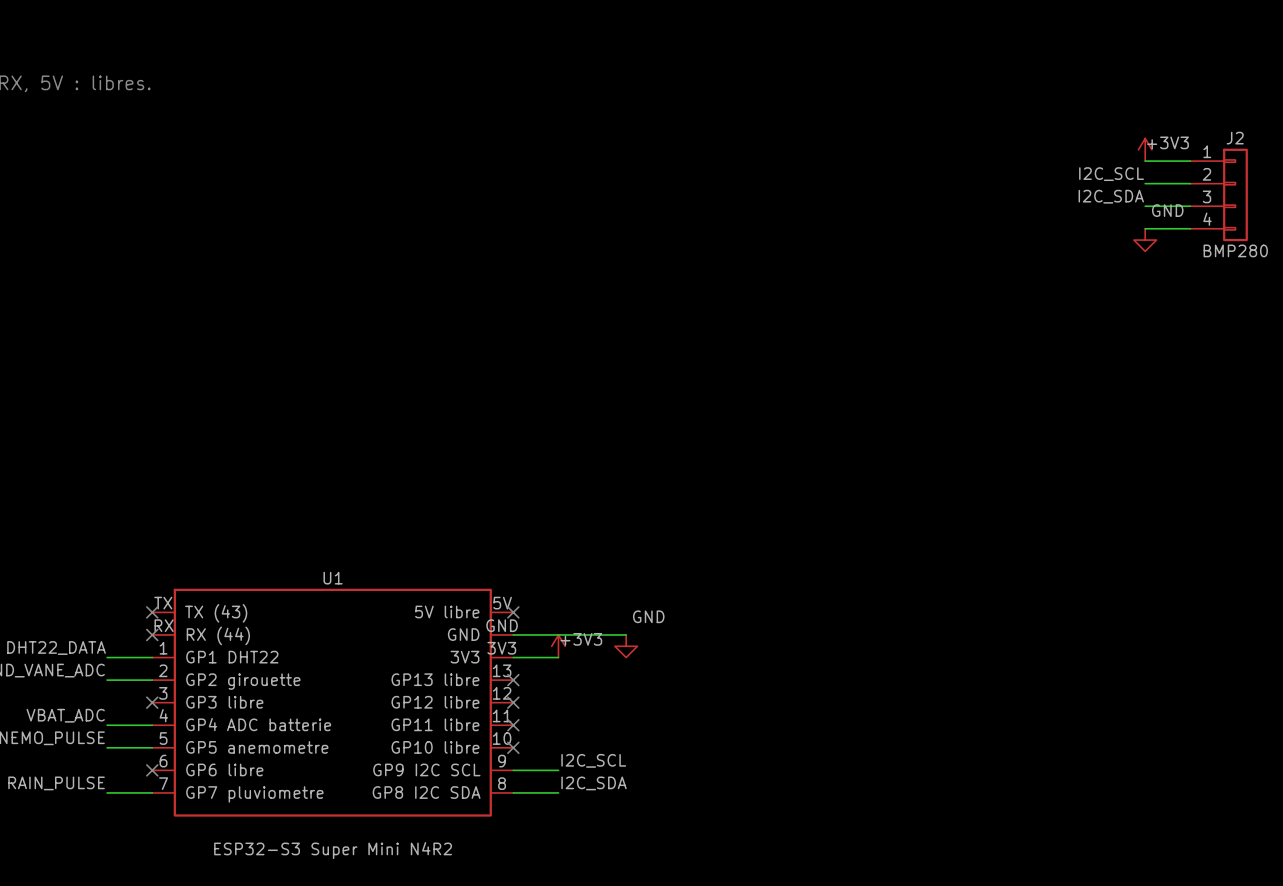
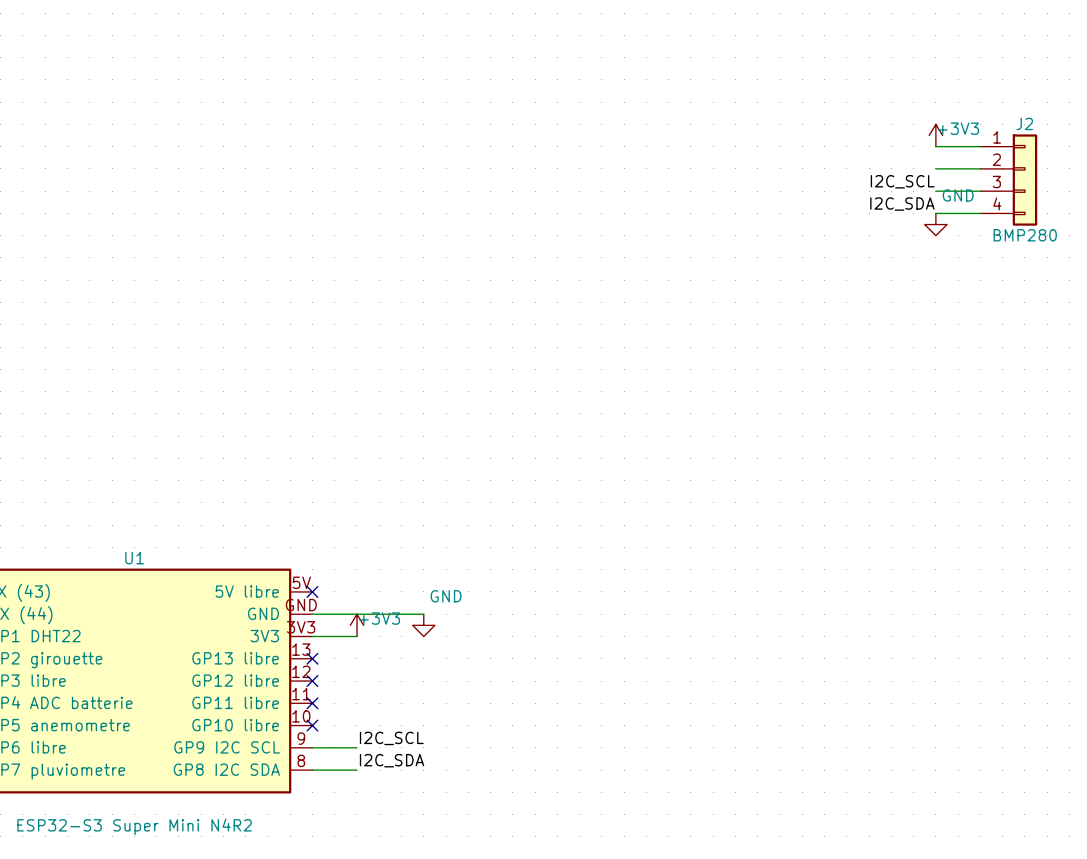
label: I2C_SCL (1111, 174) -> none
label: I2C_SDA (1111, 196) -> I2C_SCL (902, 181)
label: none -> I2C_SDA (902, 204)

